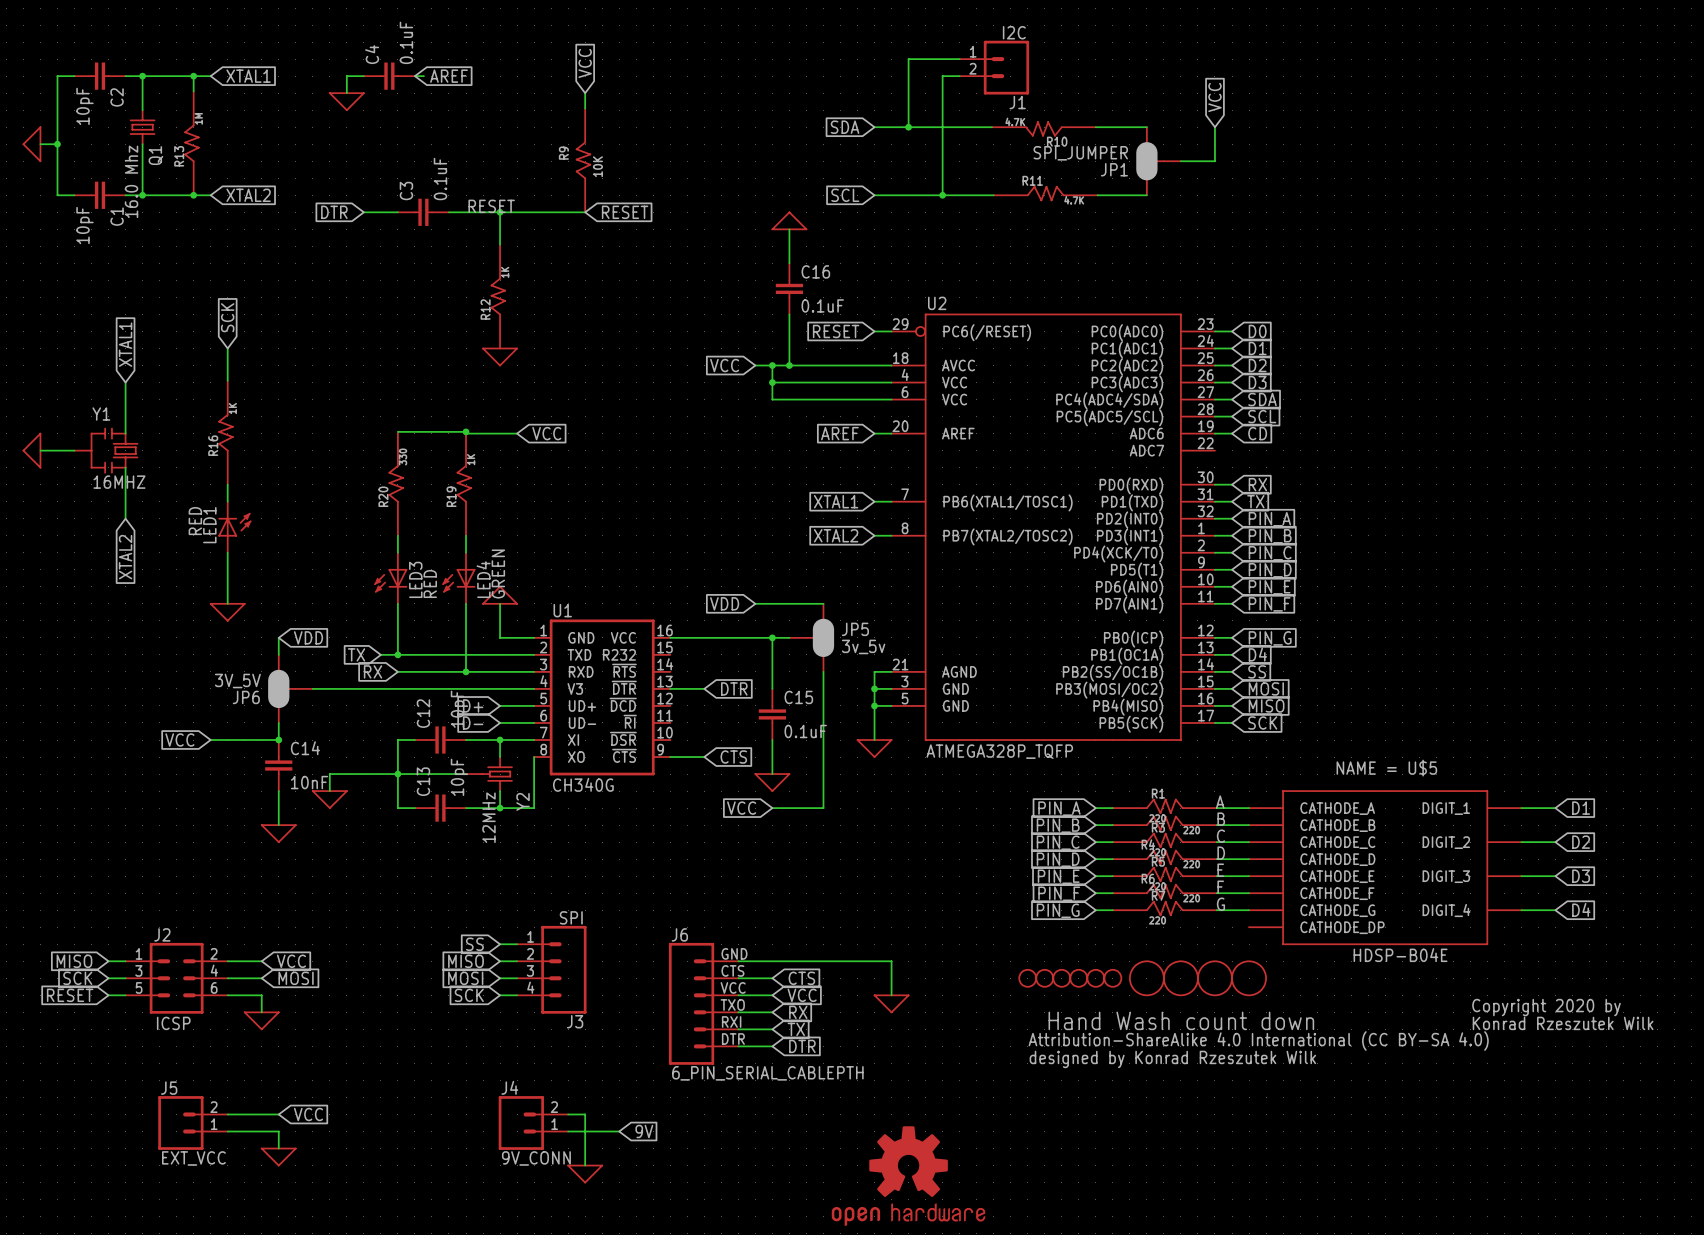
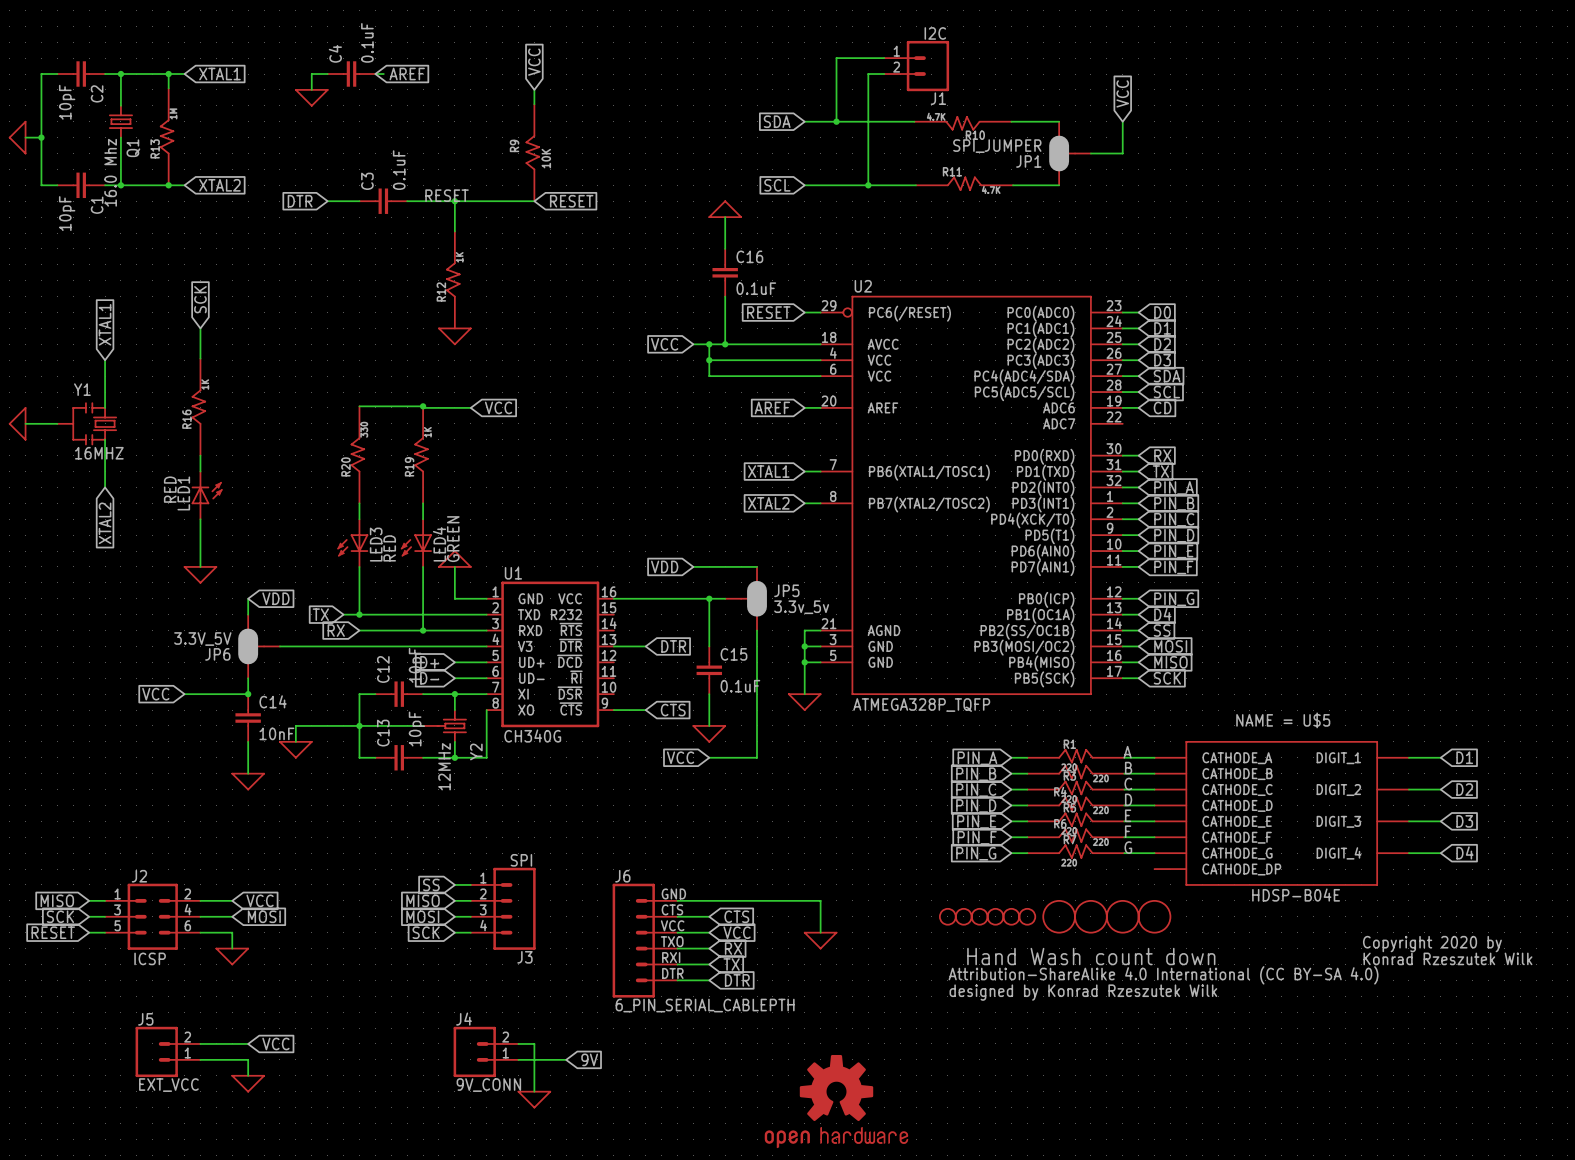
JP5 value: 3v_5v (863, 646) -> 3.3v_5v (801, 607)
JP6 value: 3V_5V (237, 680) -> 3.3V_5V (202, 639)

